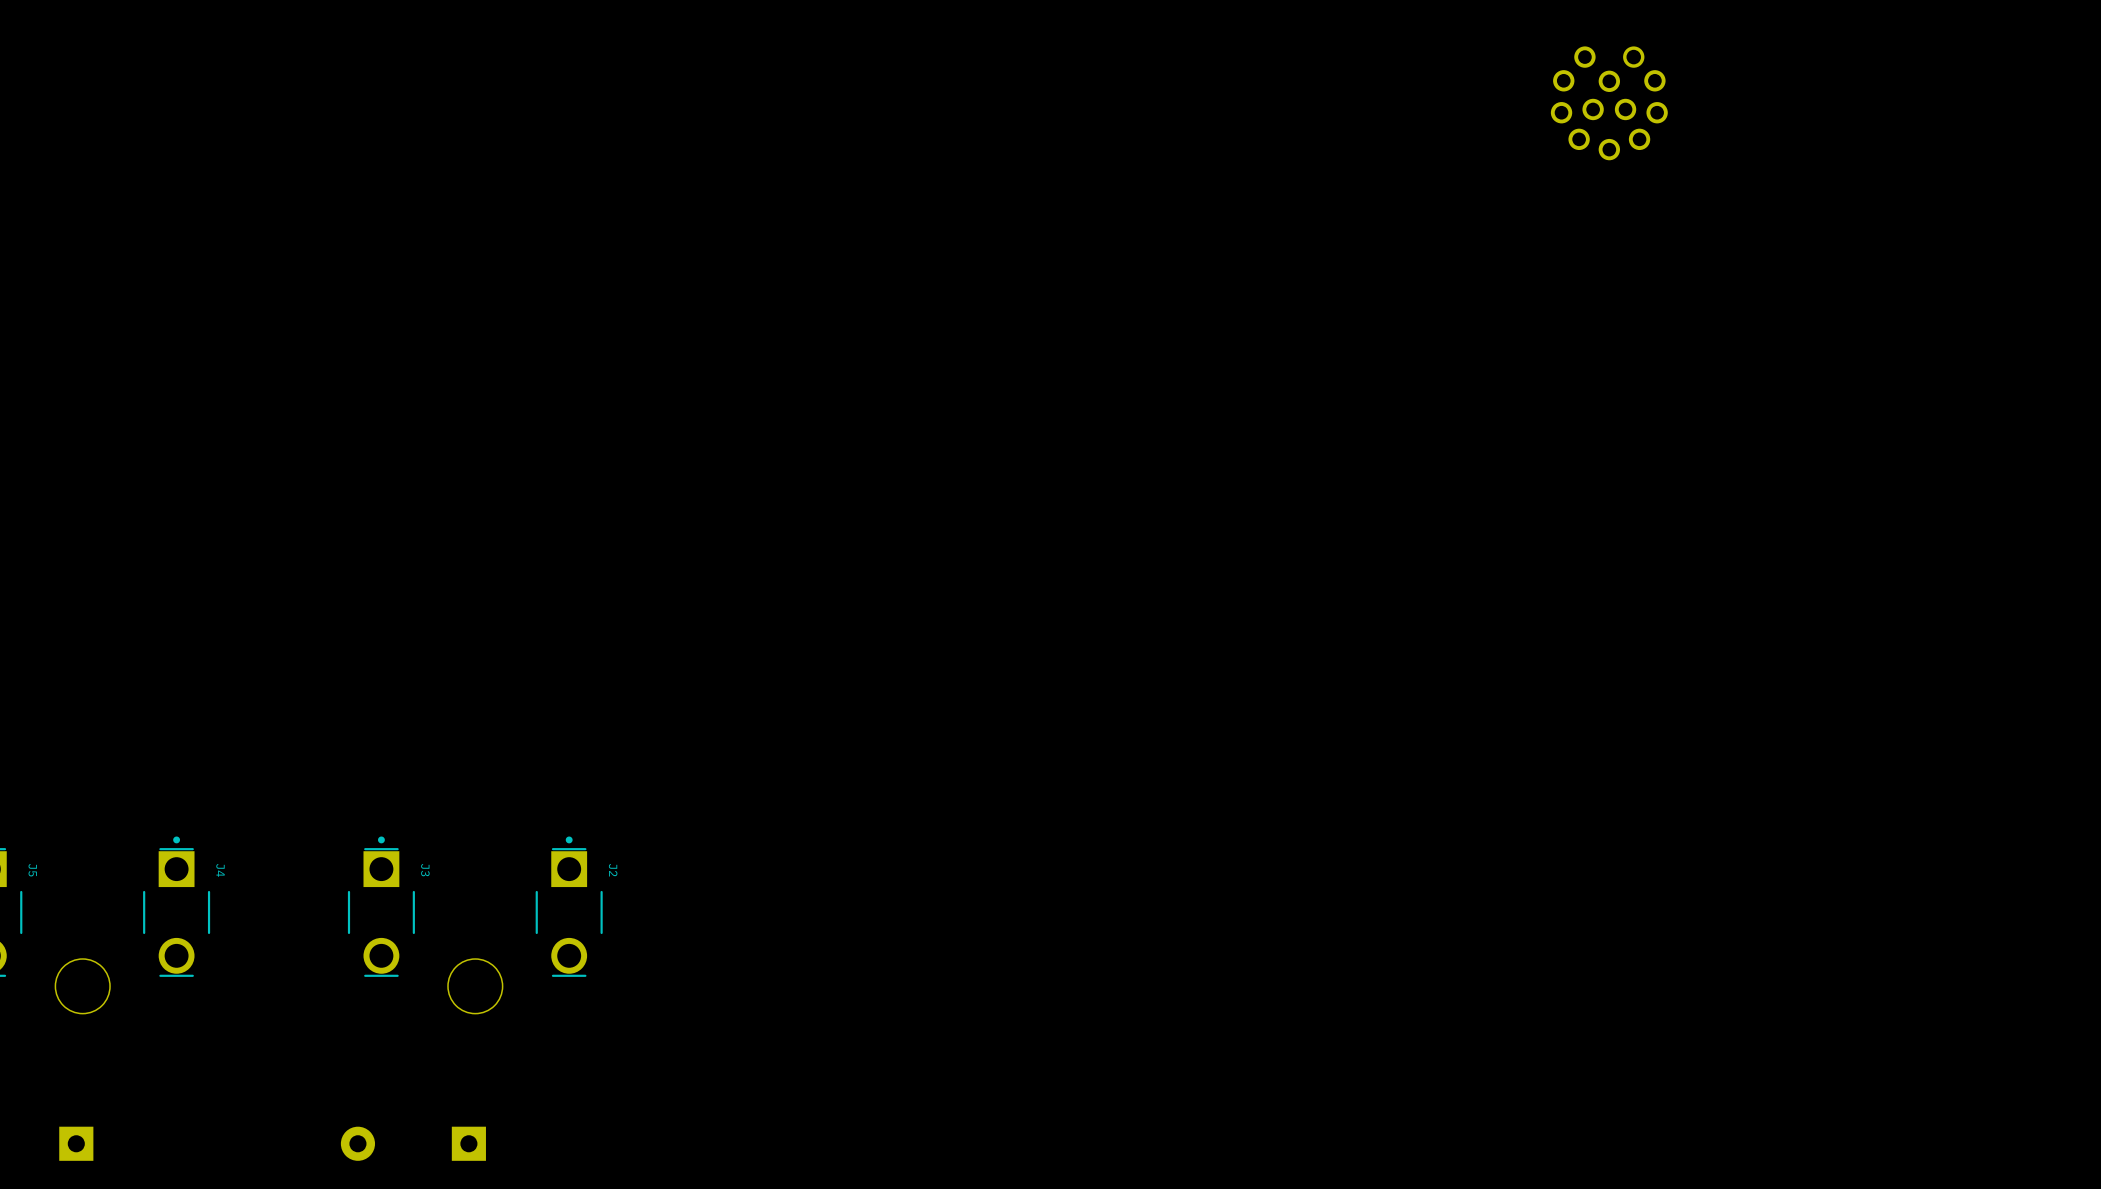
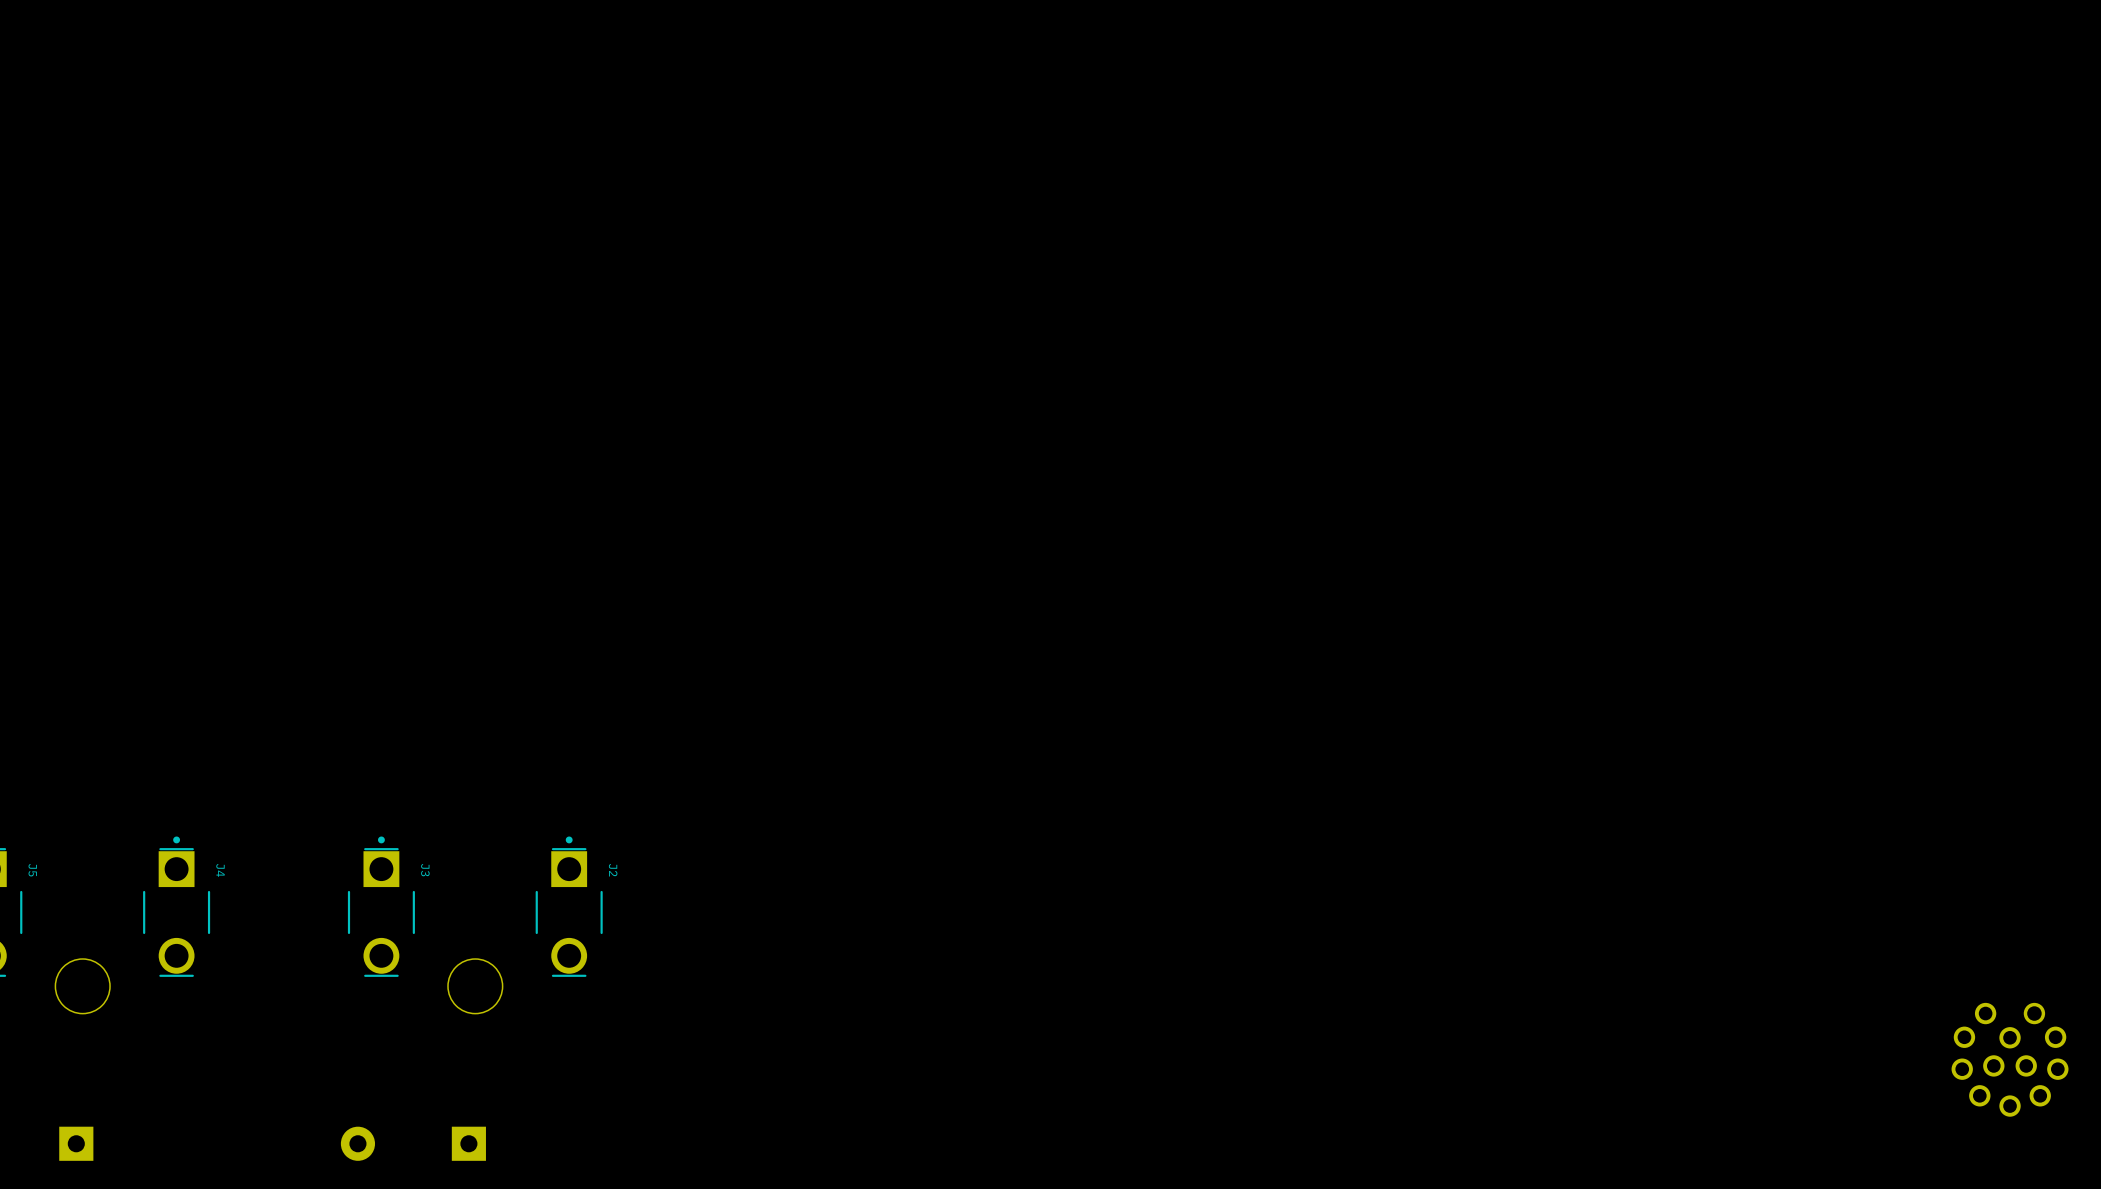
part: (1609, 103) -> none
part: none -> (2010, 1059)

